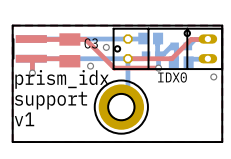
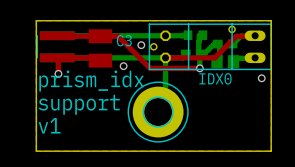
part footprint: [138, 32, 164, 45] -> [183, 30, 208, 40]

